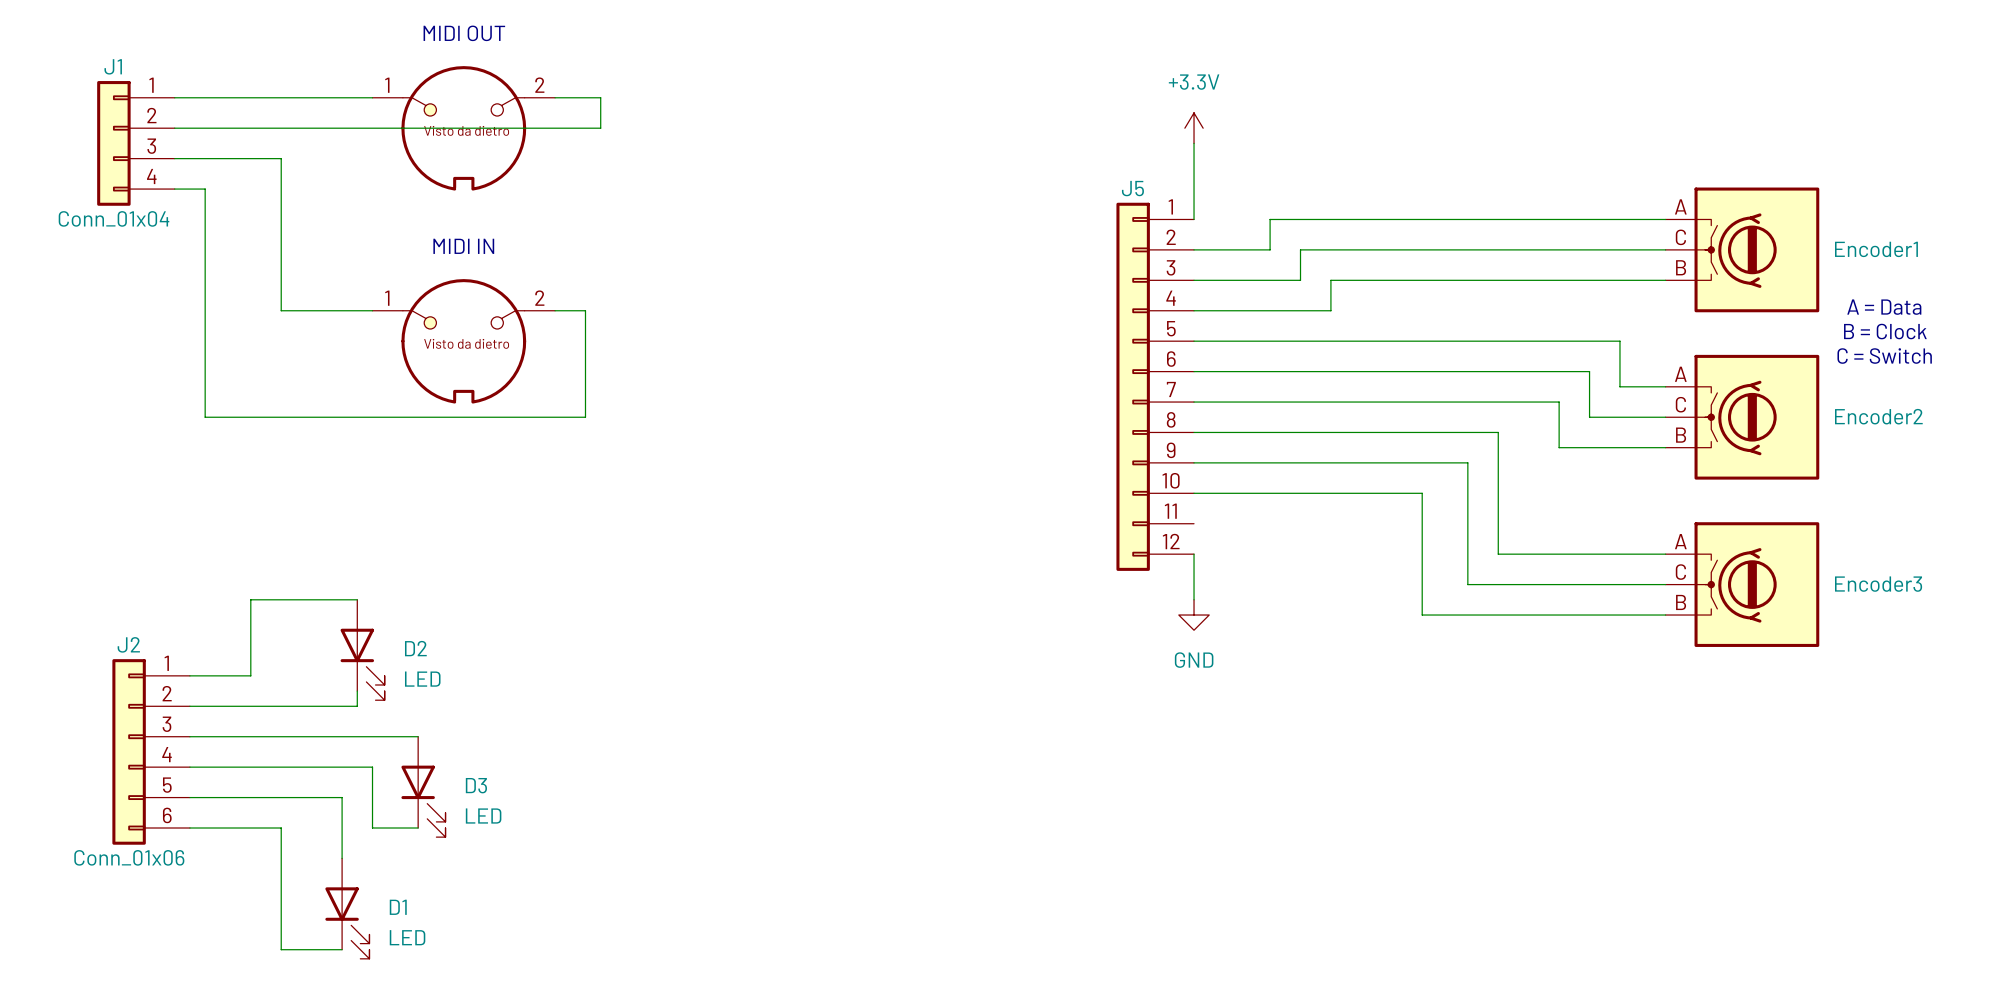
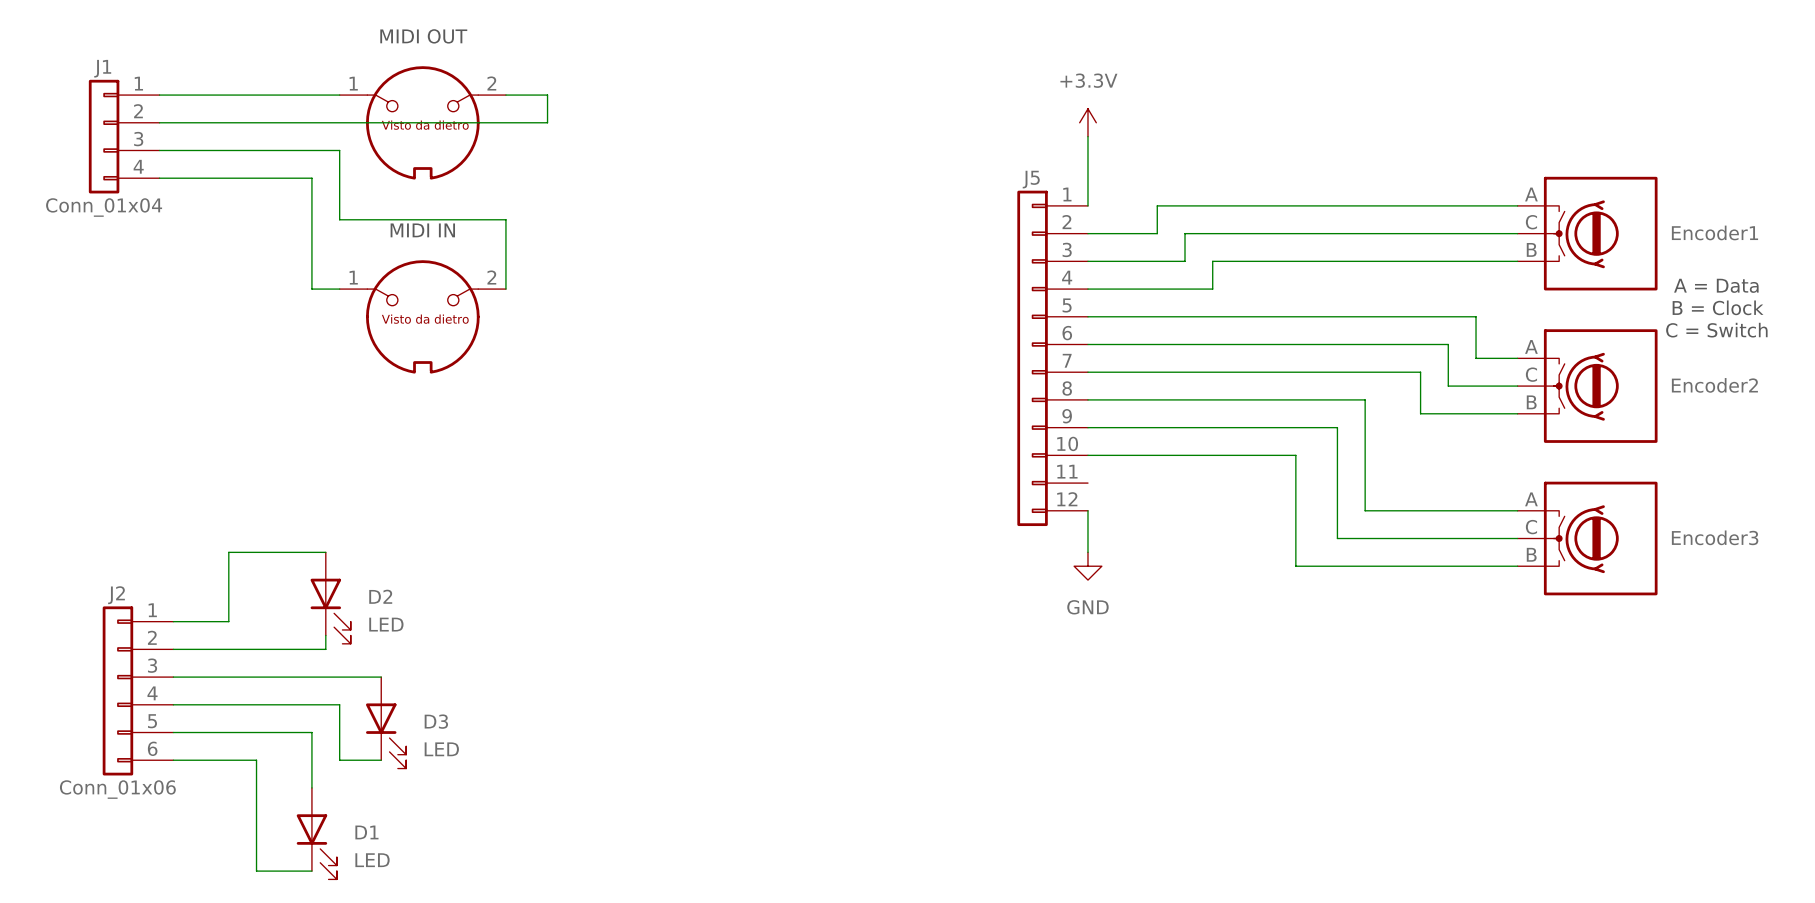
wire: (281, 158) (281, 310) (342, 310) -> (187, 178) (311, 178) (311, 289)
wire: (205, 189) (205, 417) (585, 417) (585, 310) (555, 310) -> (256, 150) (339, 150) (339, 219) (505, 219) (505, 289)

